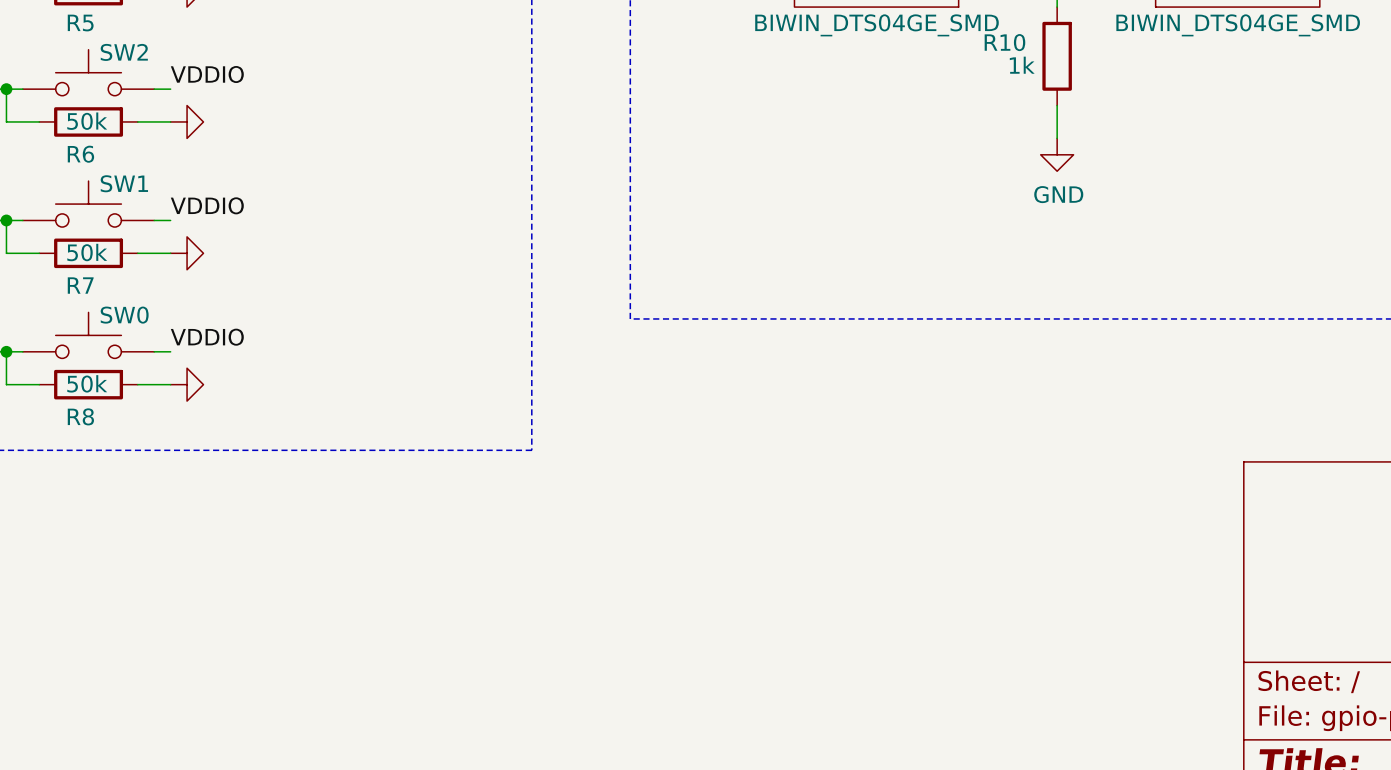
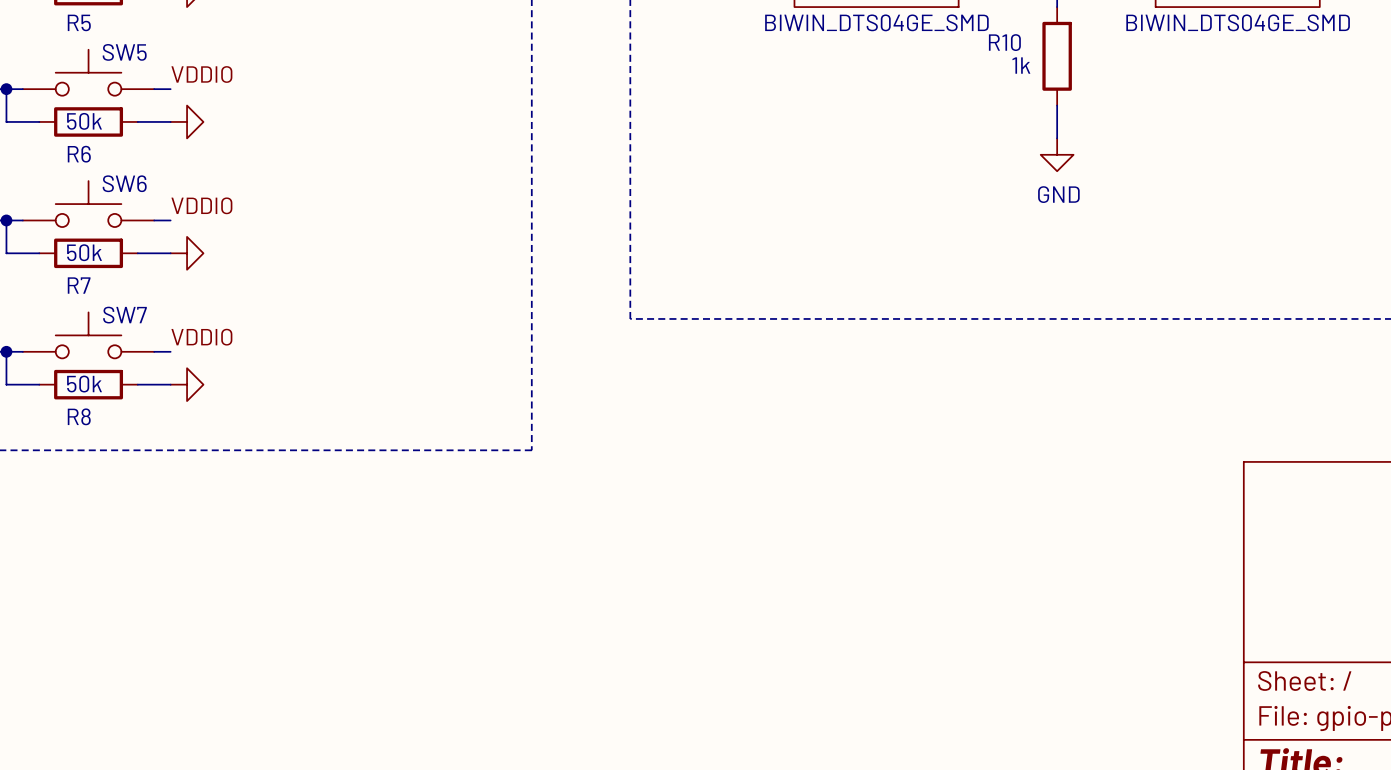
SW2 name: SW2 (124, 52) -> SW5 (124, 52)
SW1 name: SW1 (124, 183) -> SW6 (124, 183)
SW0 name: SW0 (124, 315) -> SW7 (125, 315)

